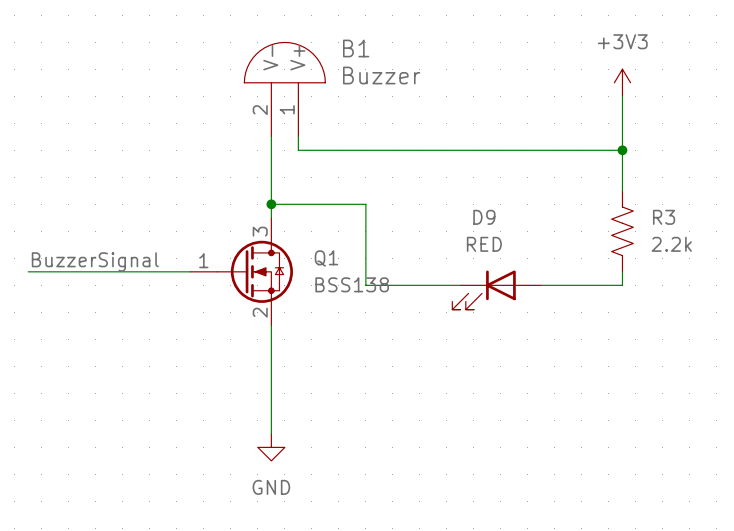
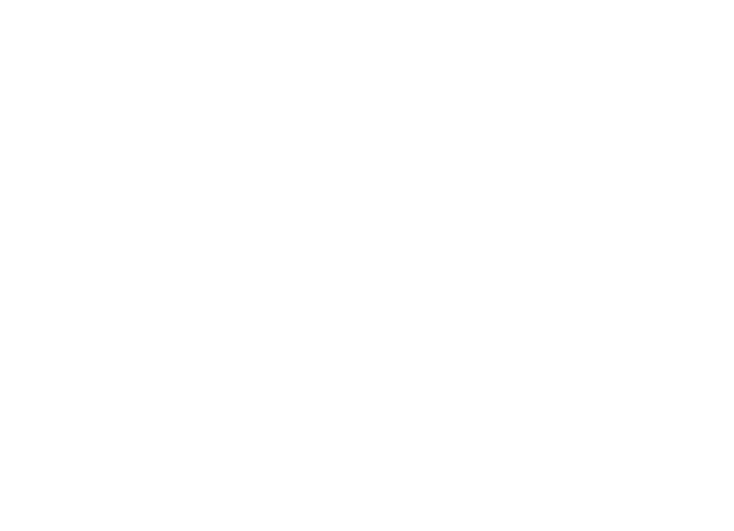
power symbol: +3V3 (622, 82) -> none
B1: Buzzer (284, 89) -> none
wire: (622, 96) (622, 190) -> none
wire: (271, 136) (271, 217) -> none
wire: (298, 136) (298, 150) (622, 150) -> none
junction: (622, 150) -> none
wire: (271, 204) (365, 204) (365, 285) (460, 285) -> none
junction: (271, 204) -> none
R3: 2.2k (622, 231) -> none
label: BuzzerSignal (95, 262) -> none
wire: (28, 271) (190, 271) -> none
Q1: BSS138 (241, 271) -> none
wire: (622, 271) (622, 285) (541, 285) -> none
D9: RED (496, 290) -> none
wire: (271, 325) (271, 433) -> none
power symbol: GND (271, 447) -> none

